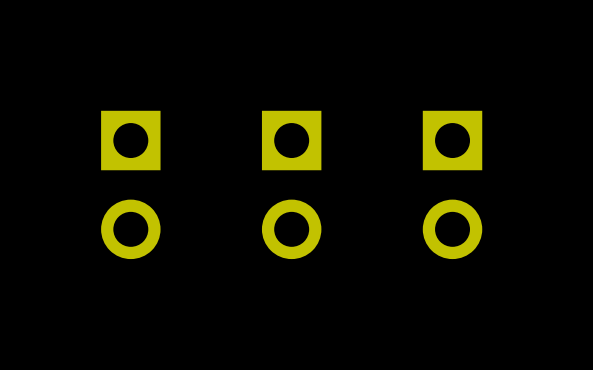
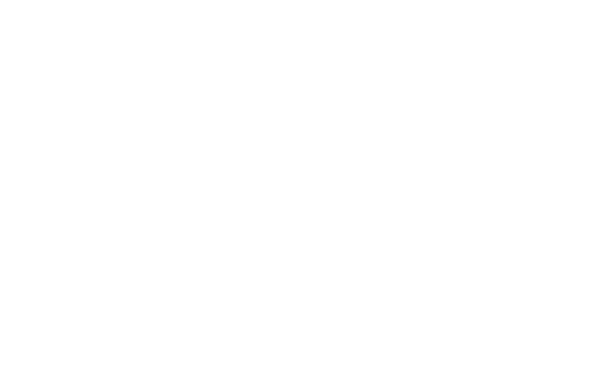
part: (130, 184) -> none
part: (291, 184) -> none
part: (452, 184) -> none

